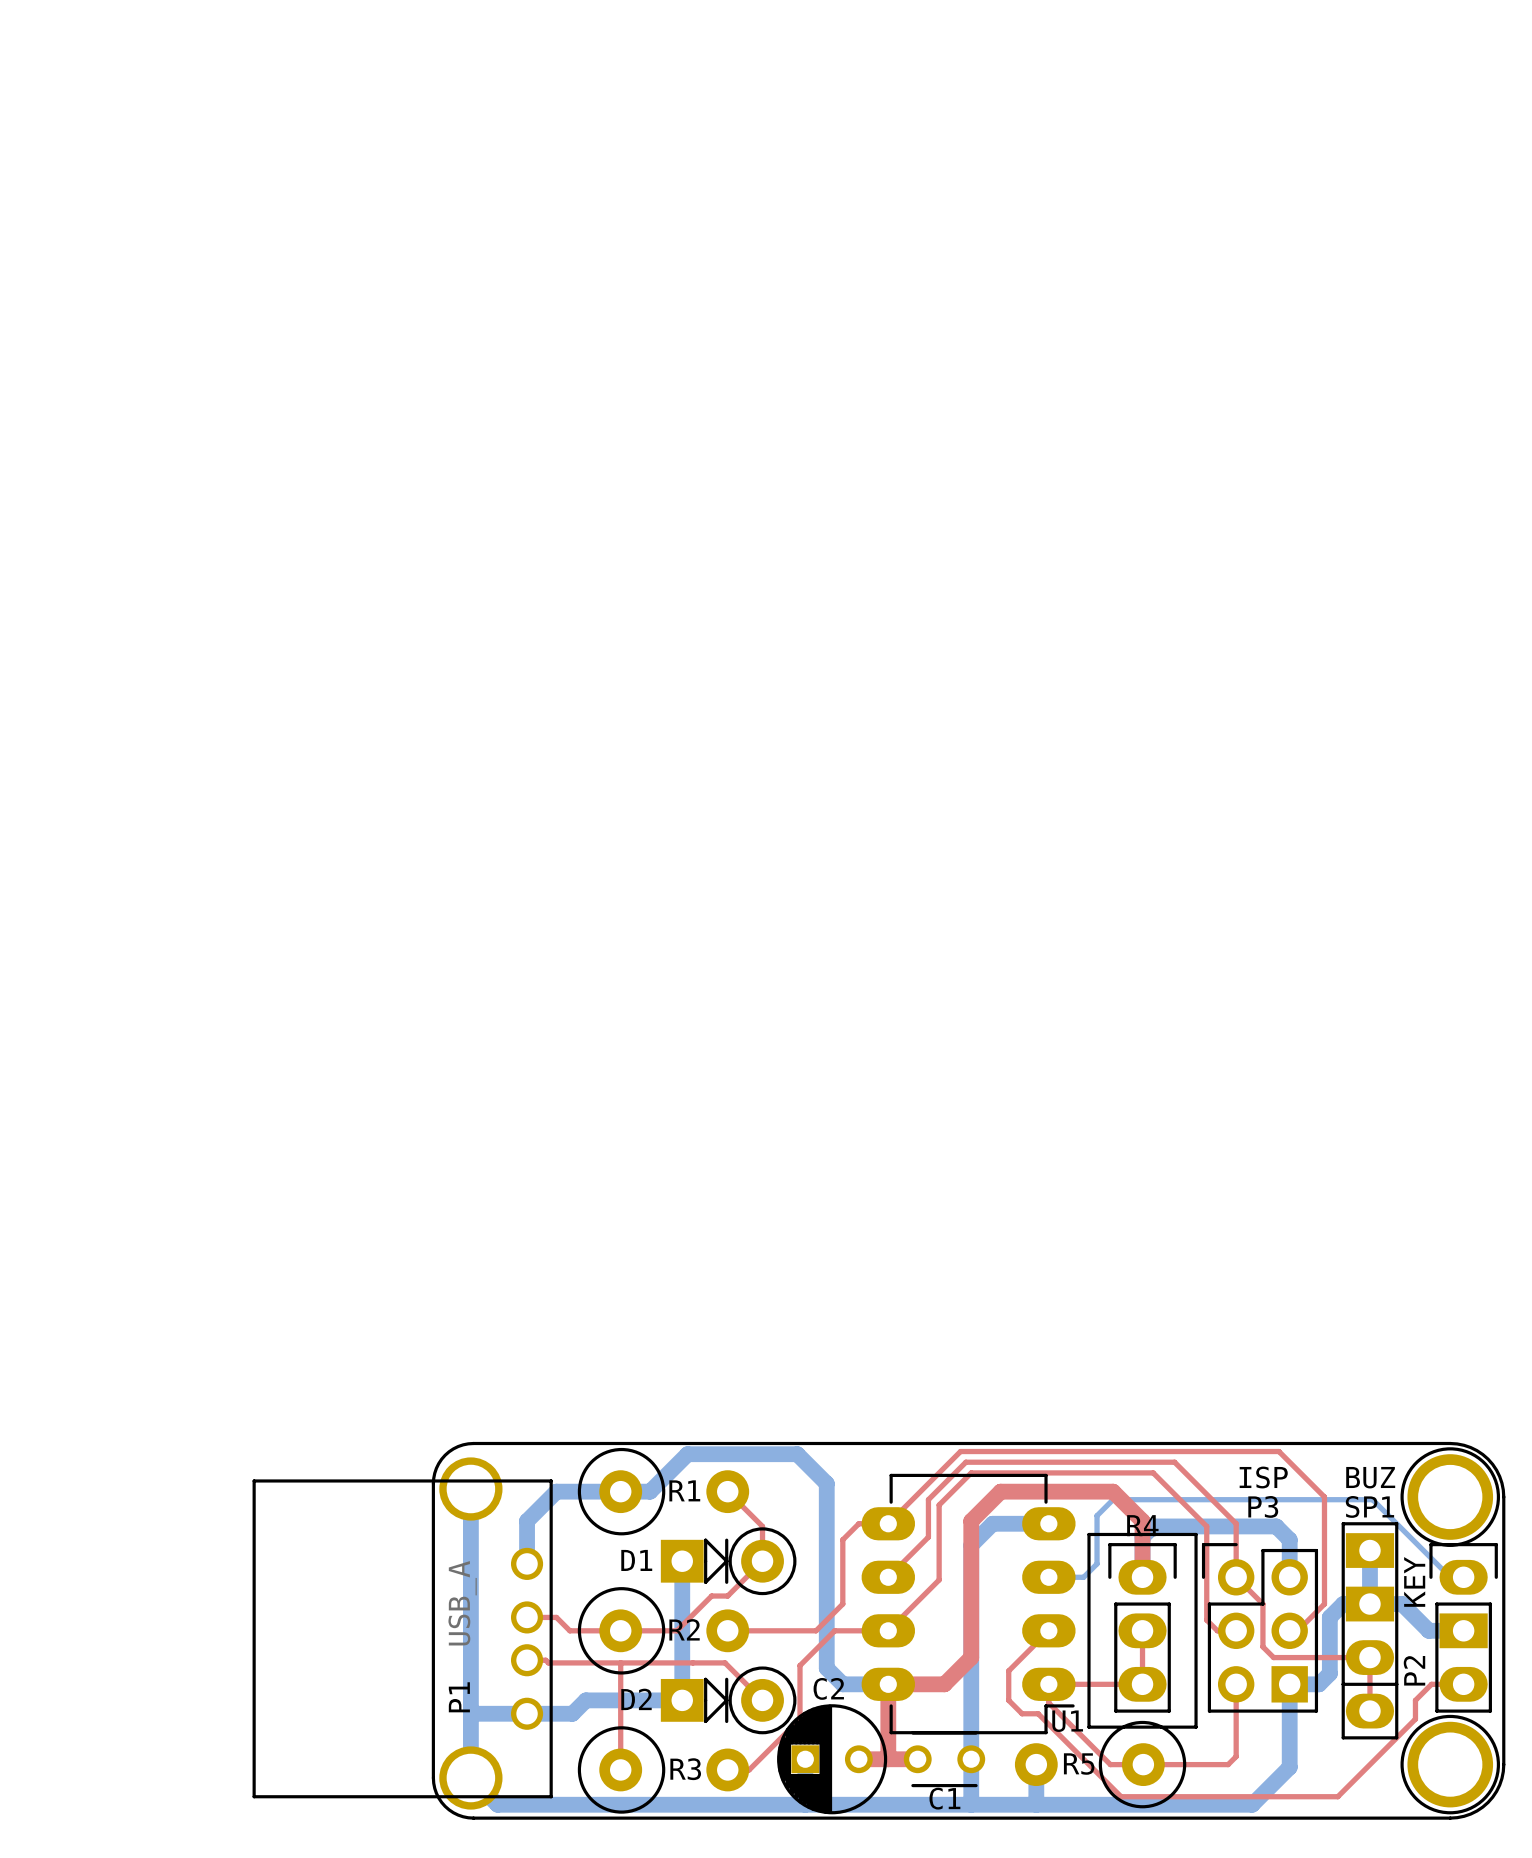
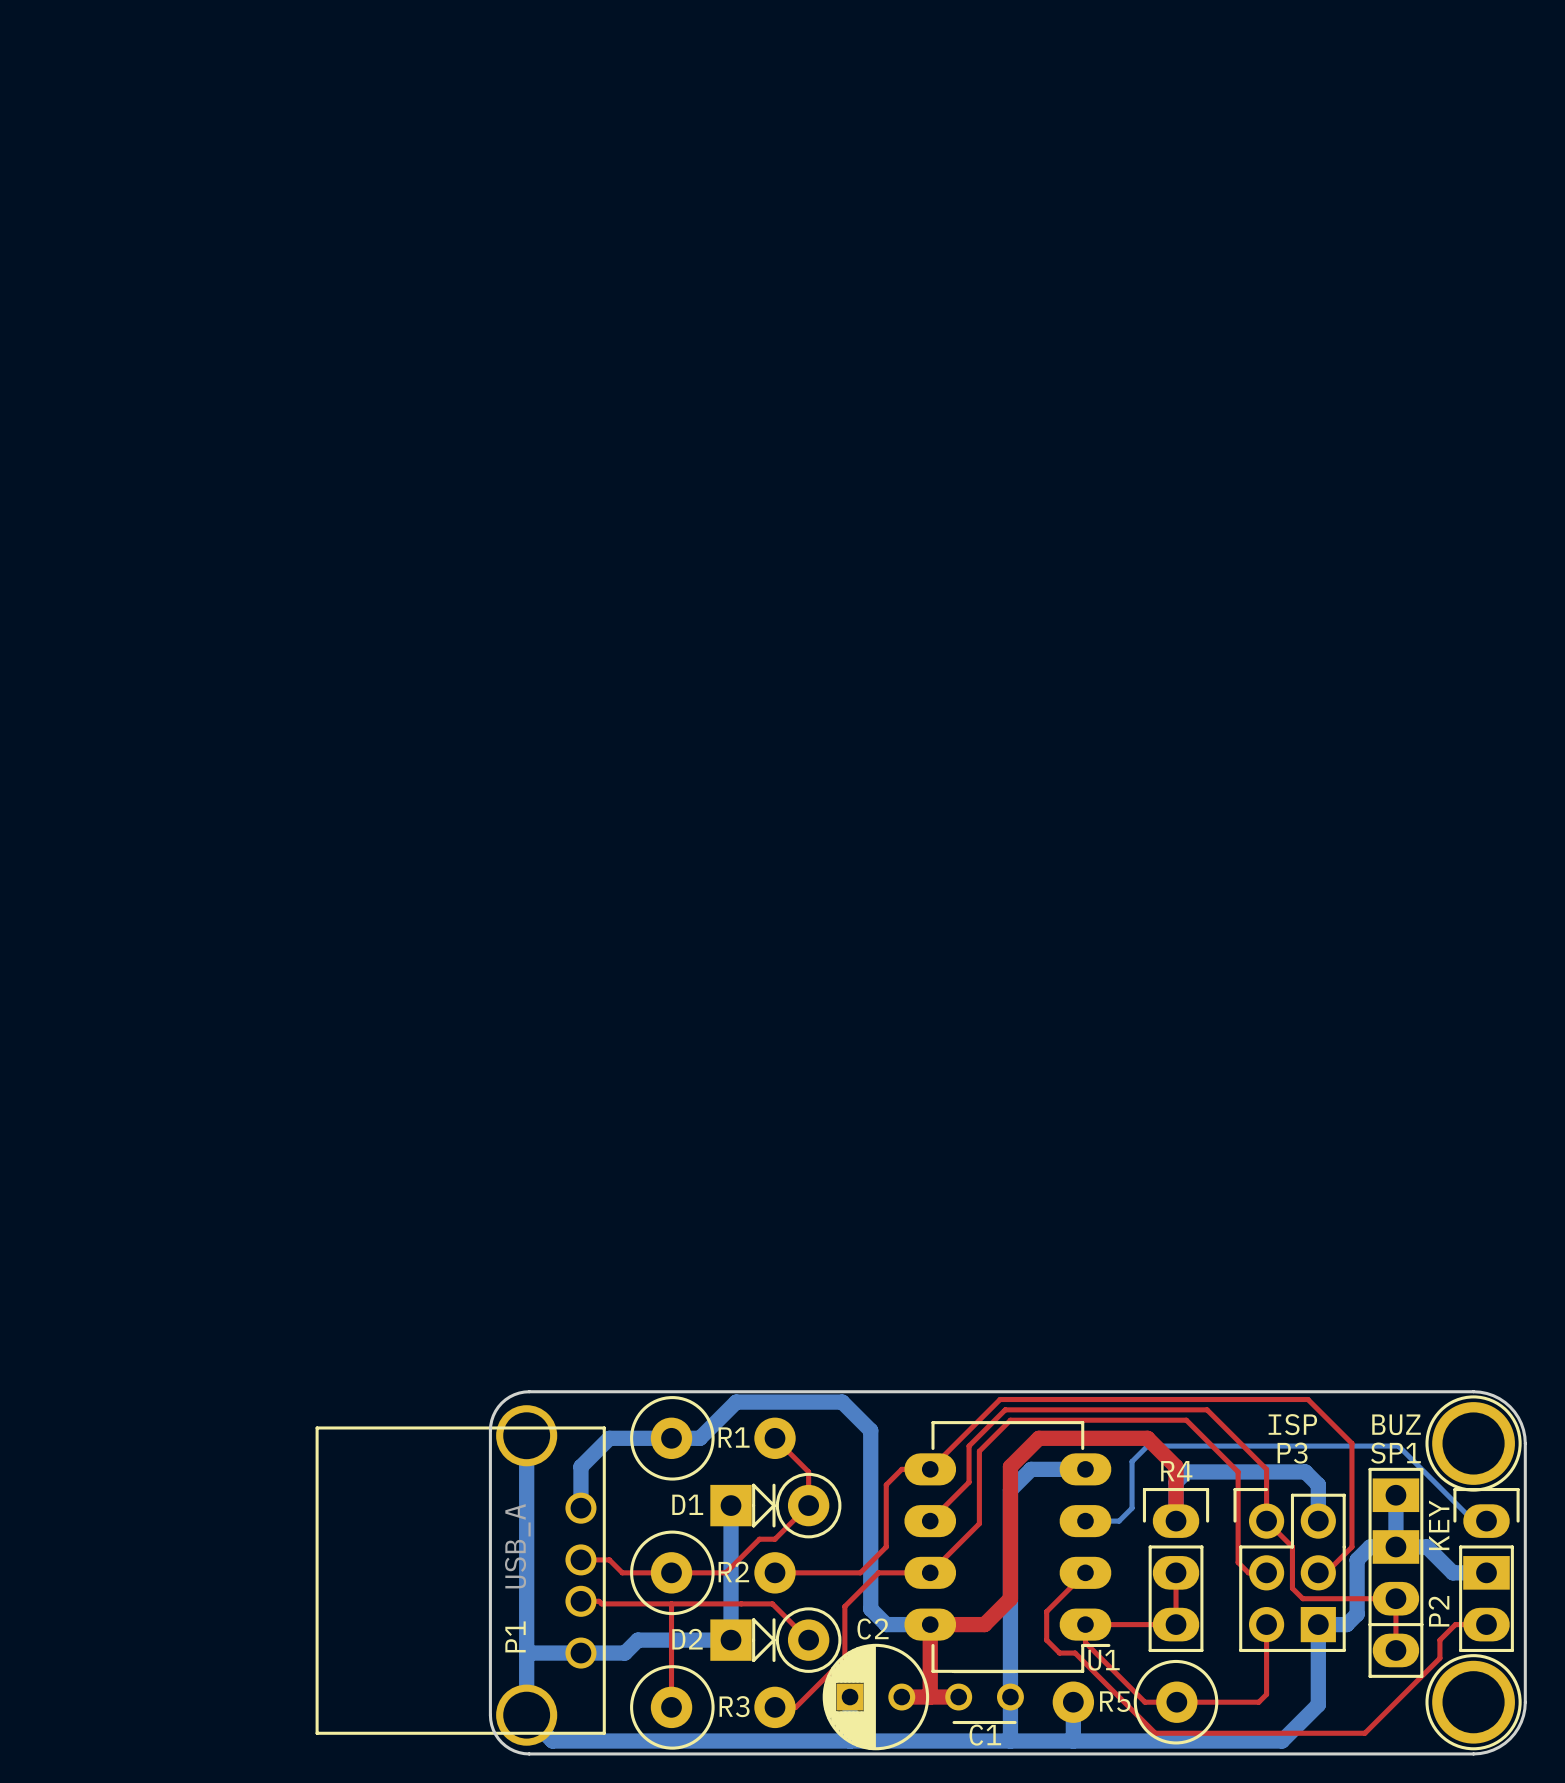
R4 footprint: [1087, 1532, 1198, 1729] -> [1142, 1488, 1210, 1652]

